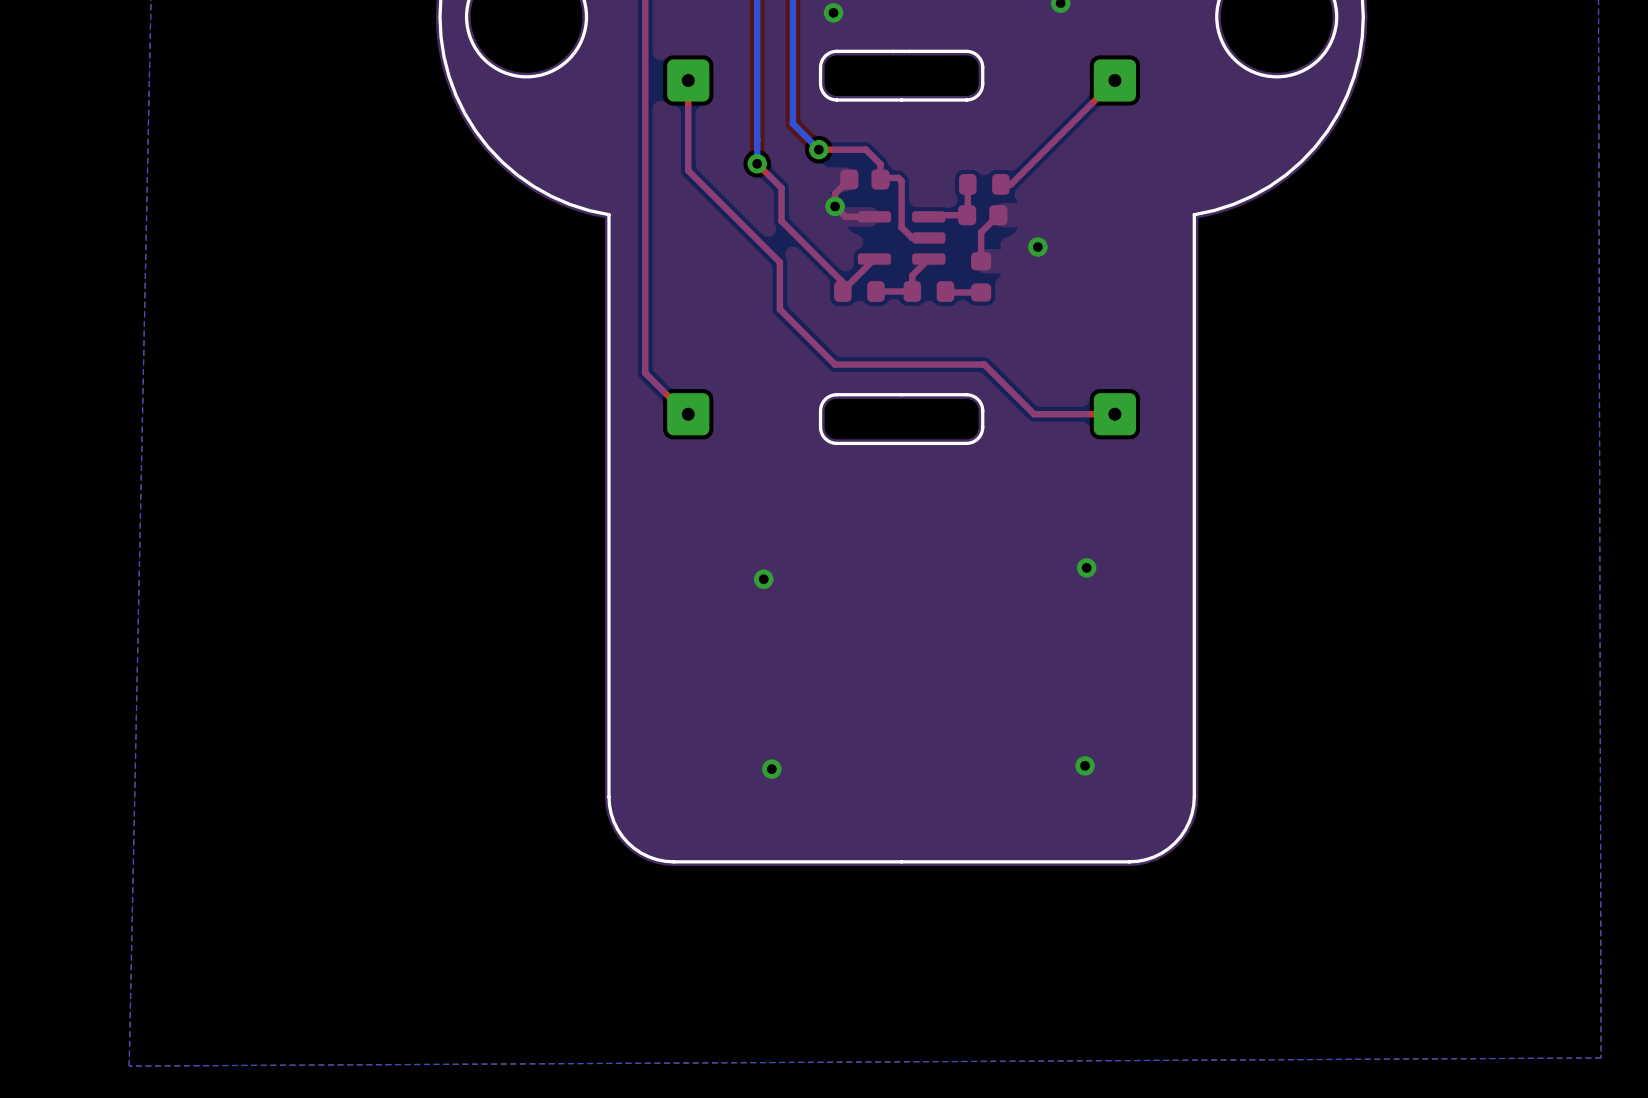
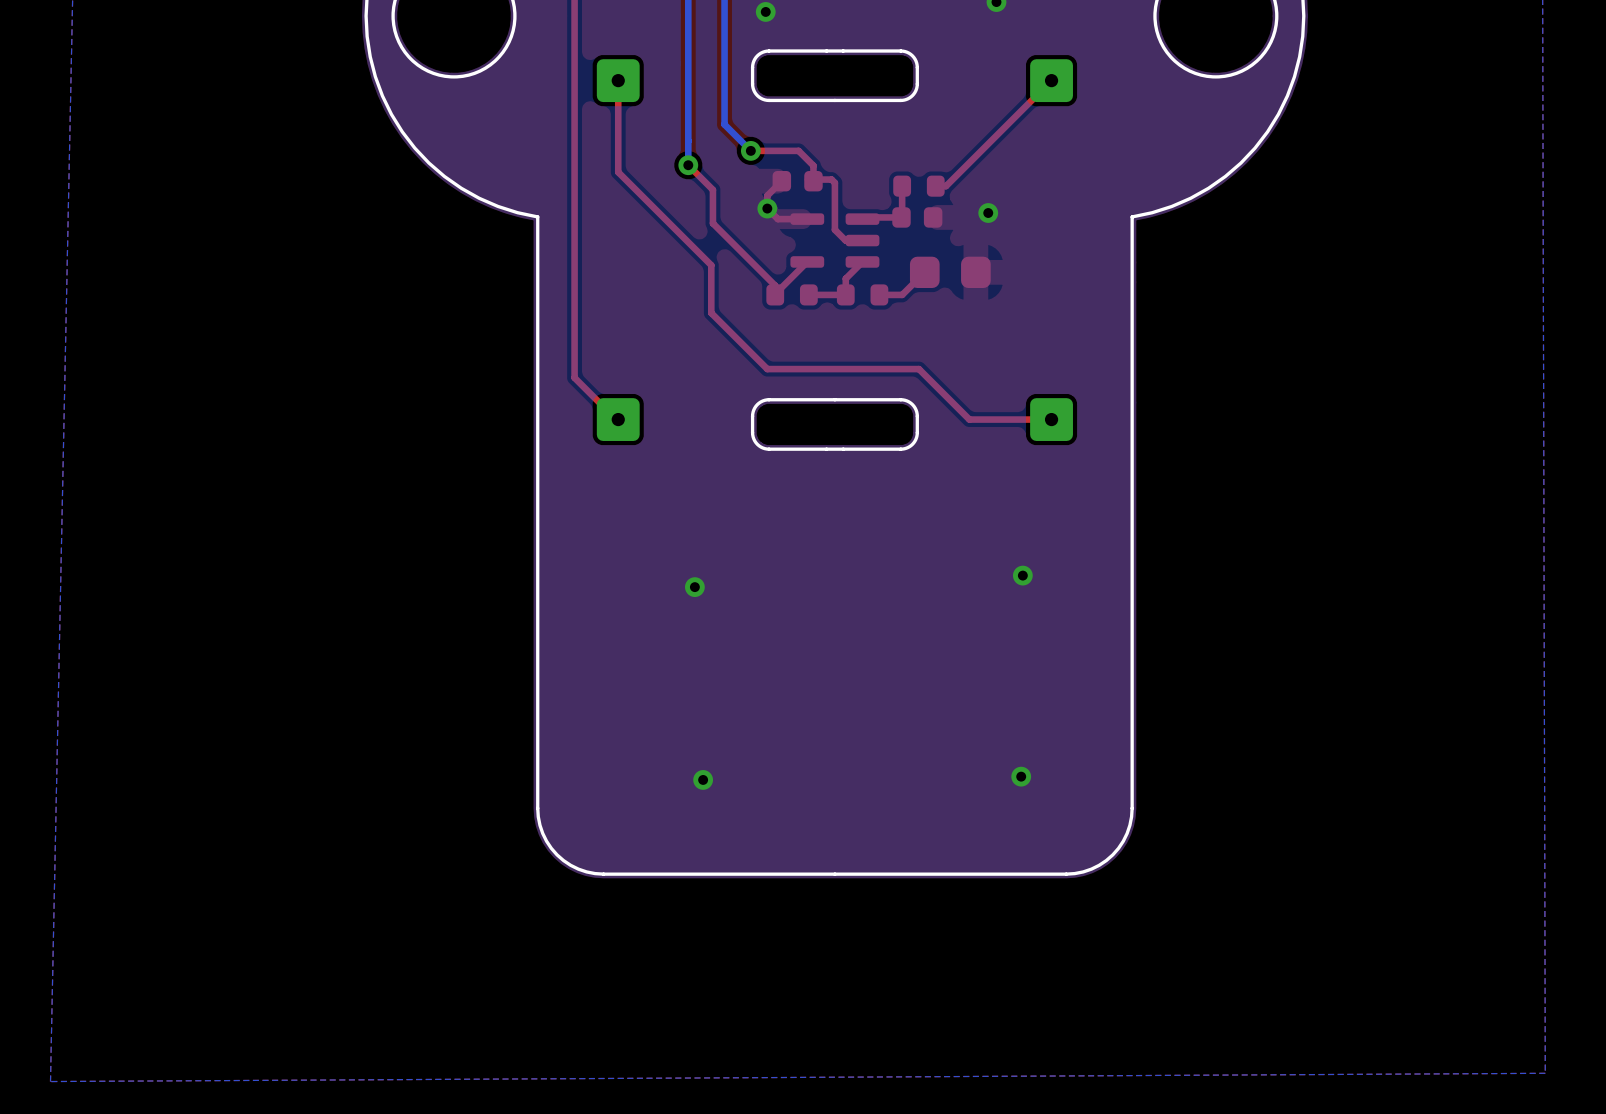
top track: (998, 215) (981, 232) (981, 261) -> none
via position: (1037, 247) -> (988, 213)
top track: none -> (924, 272) (902, 294) (879, 294)
part: none -> (950, 272)
part: (981, 276) -> none
top track: (981, 292) (946, 292) -> none

